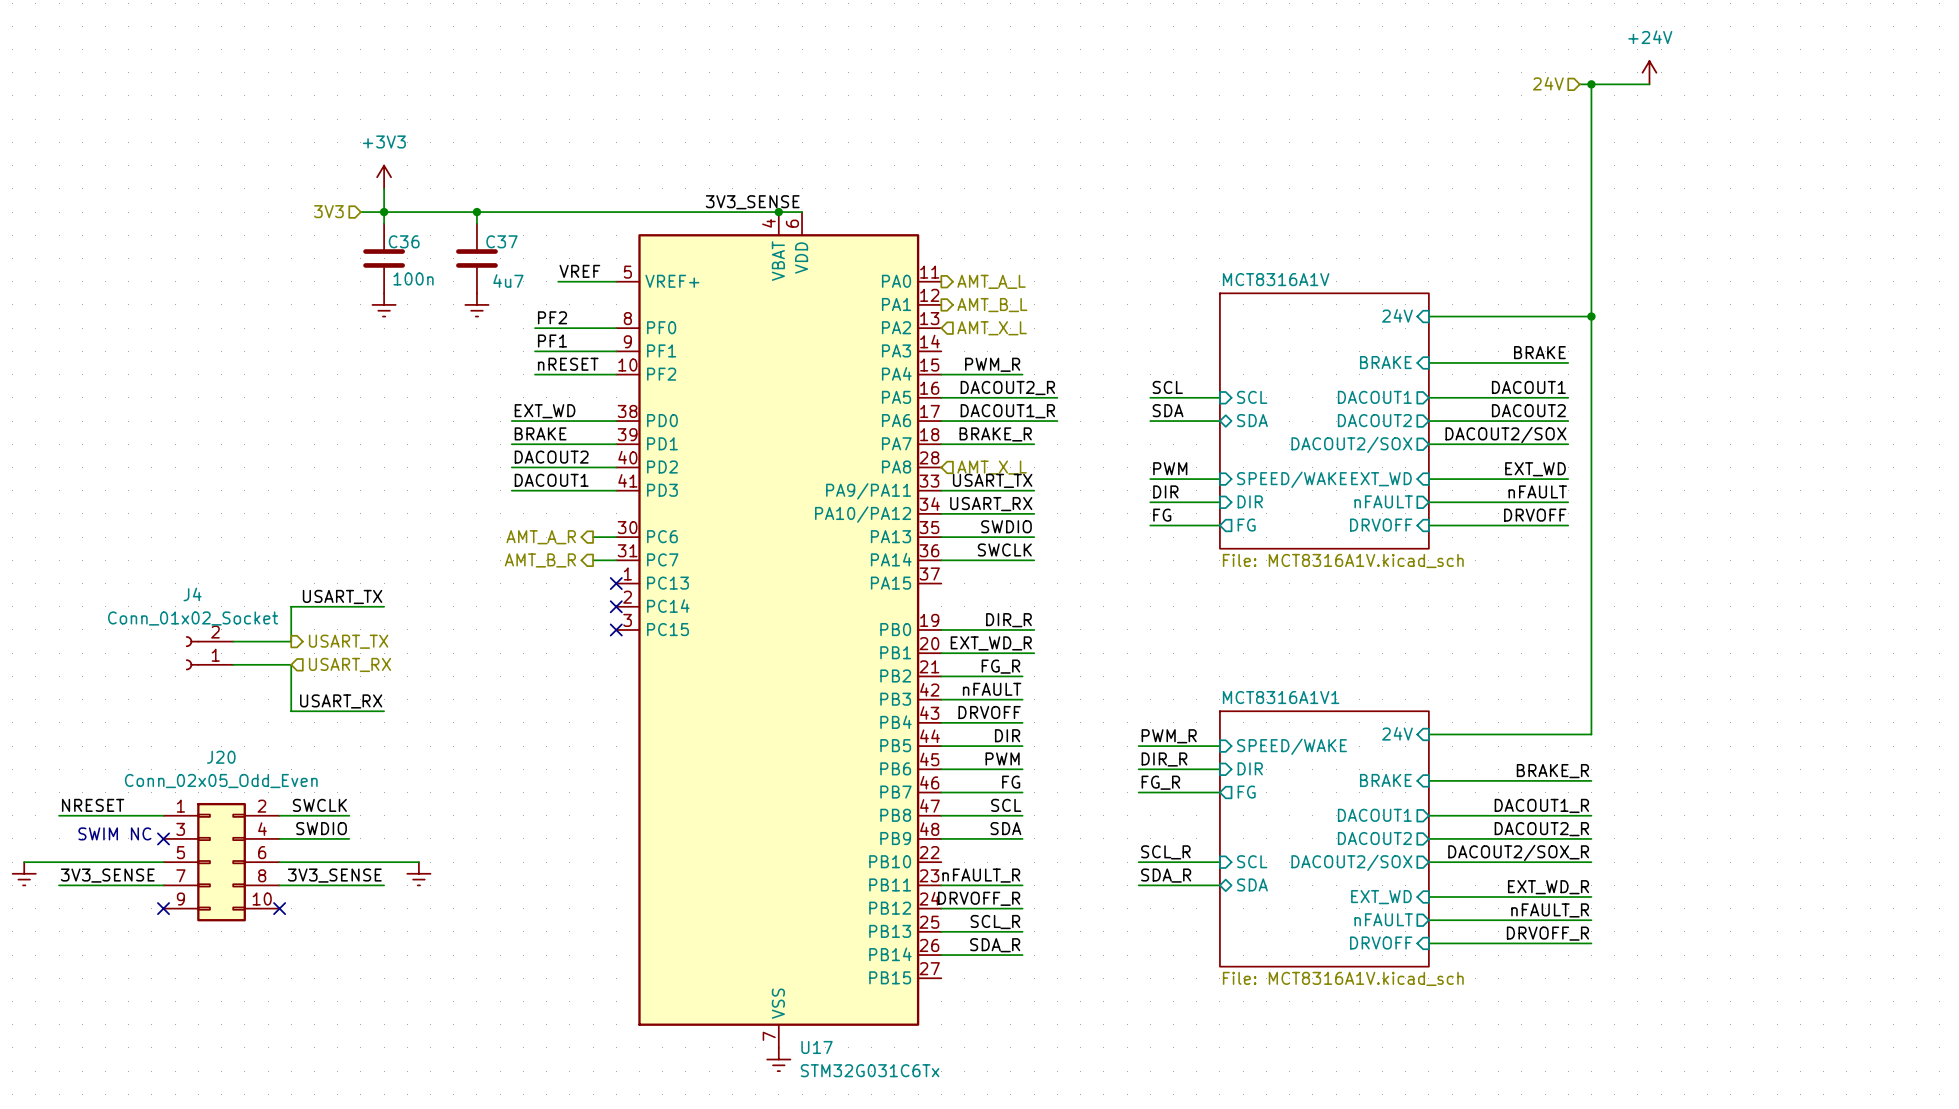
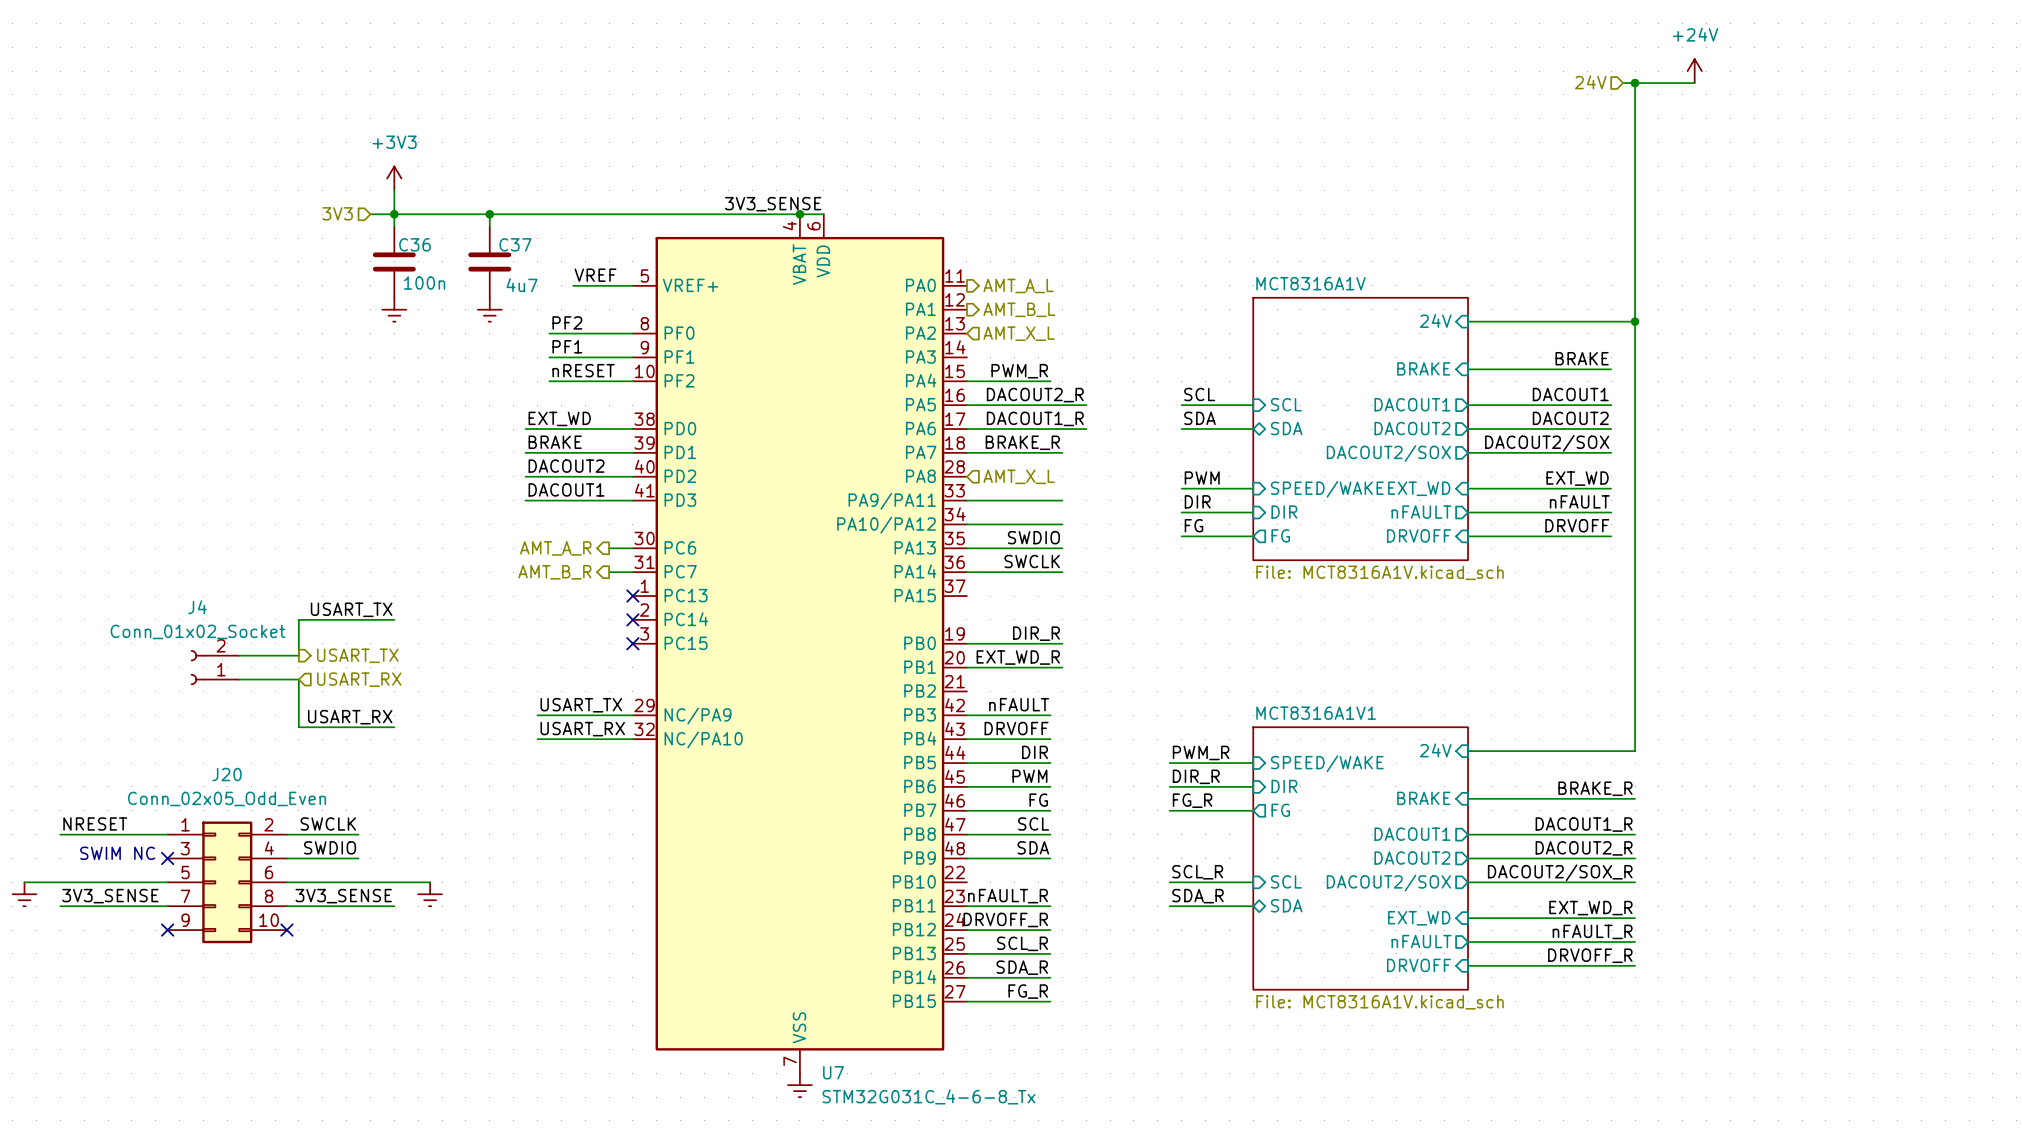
label: USART_TX (992, 480) -> none
label: USART_RX (991, 504) -> none
U17: STM32G031C6Tx (778, 629) -> none
U7: none -> STM32G031C_4-6-8_Tx (799, 643)
label: FG_R (1000, 666) -> none
wire: (941, 676) (1022, 676) -> none
label: none -> USART_TX (581, 705)
wire: none -> (537, 715) (632, 715)
label: none -> USART_RX (582, 729)
wire: none -> (537, 739) (632, 739)
label: none -> FG_R (1028, 991)
wire: none -> (966, 1001) (1050, 1001)

